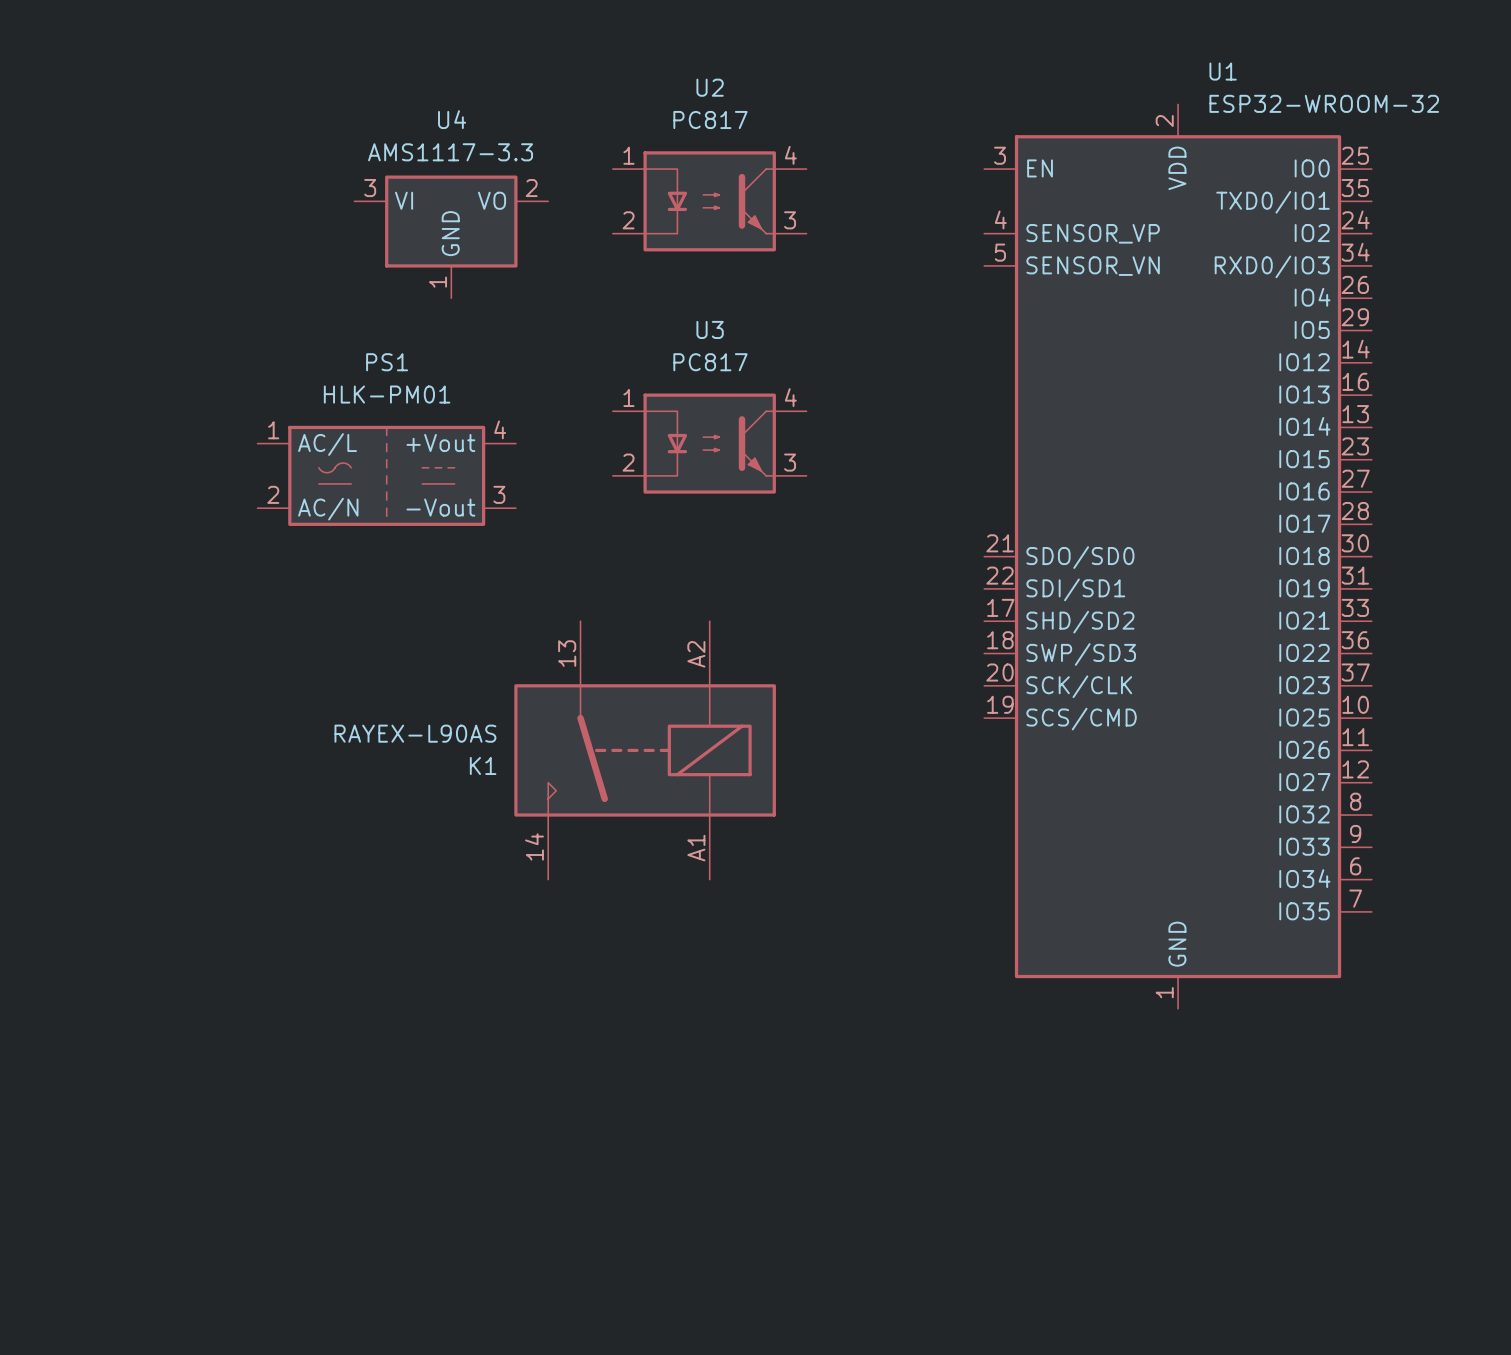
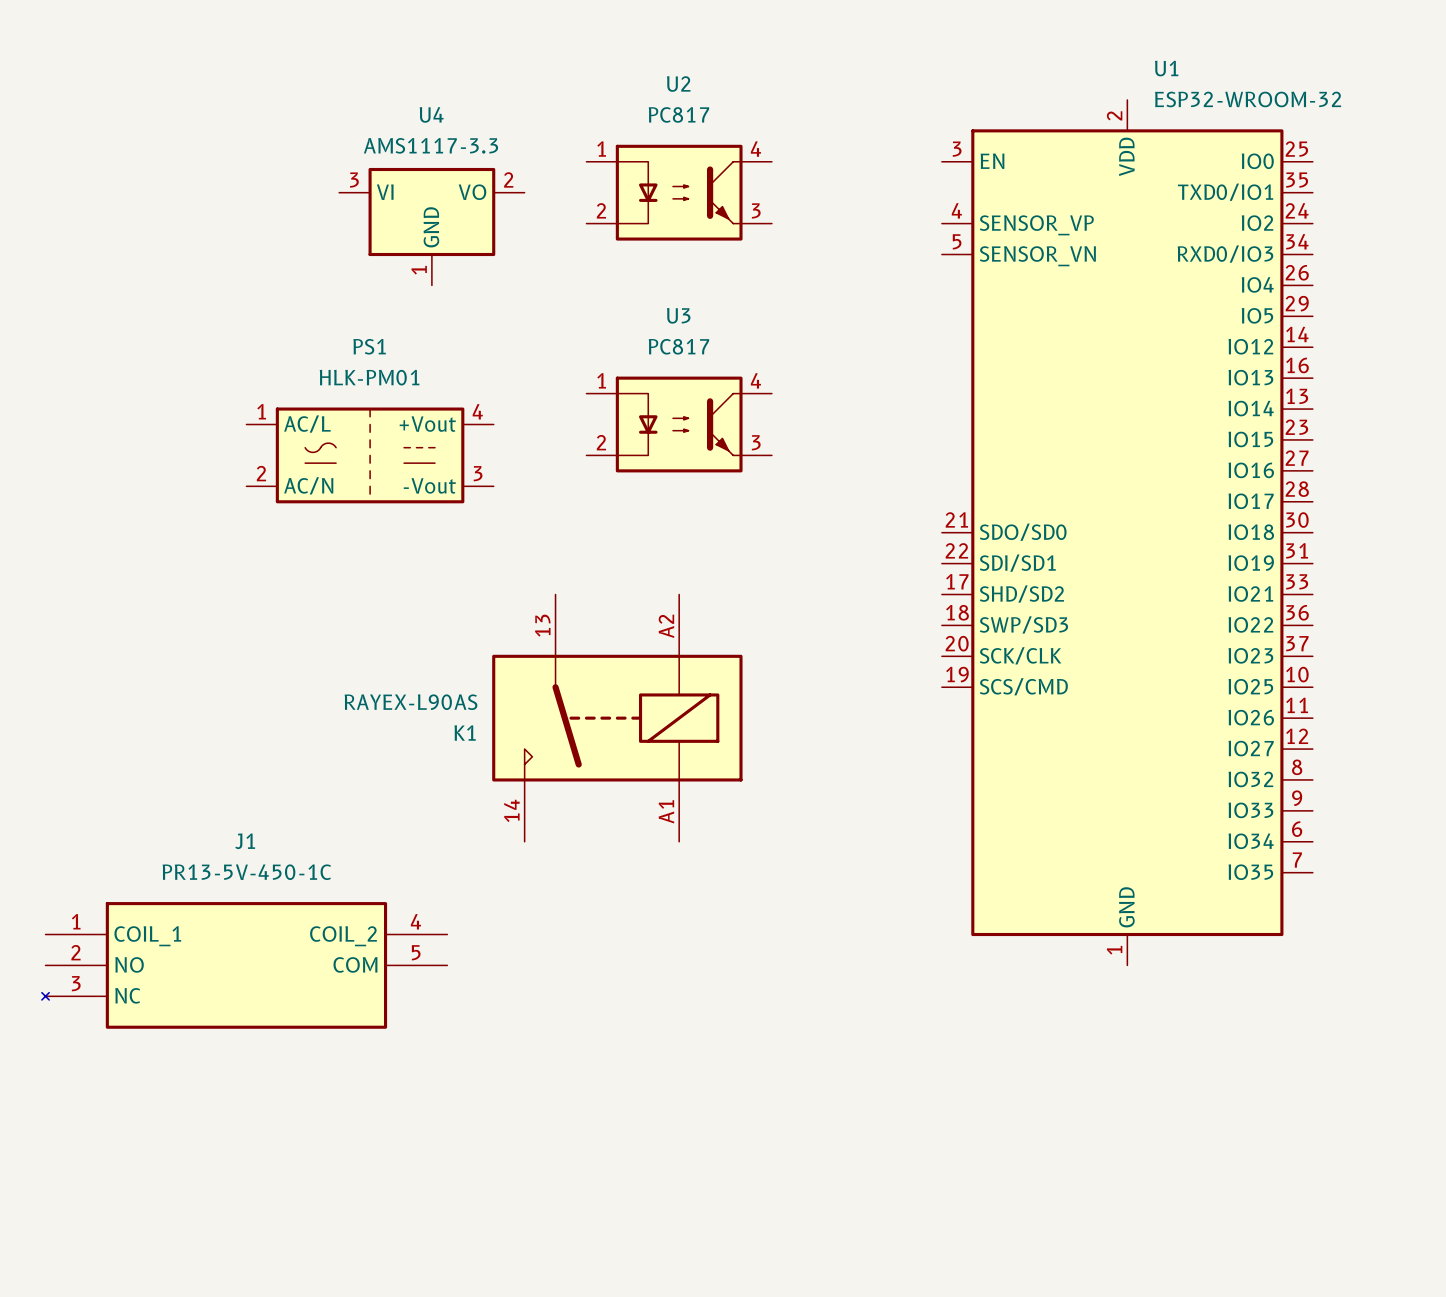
J1: none -> PR13-5V-450-1C (244, 965)

